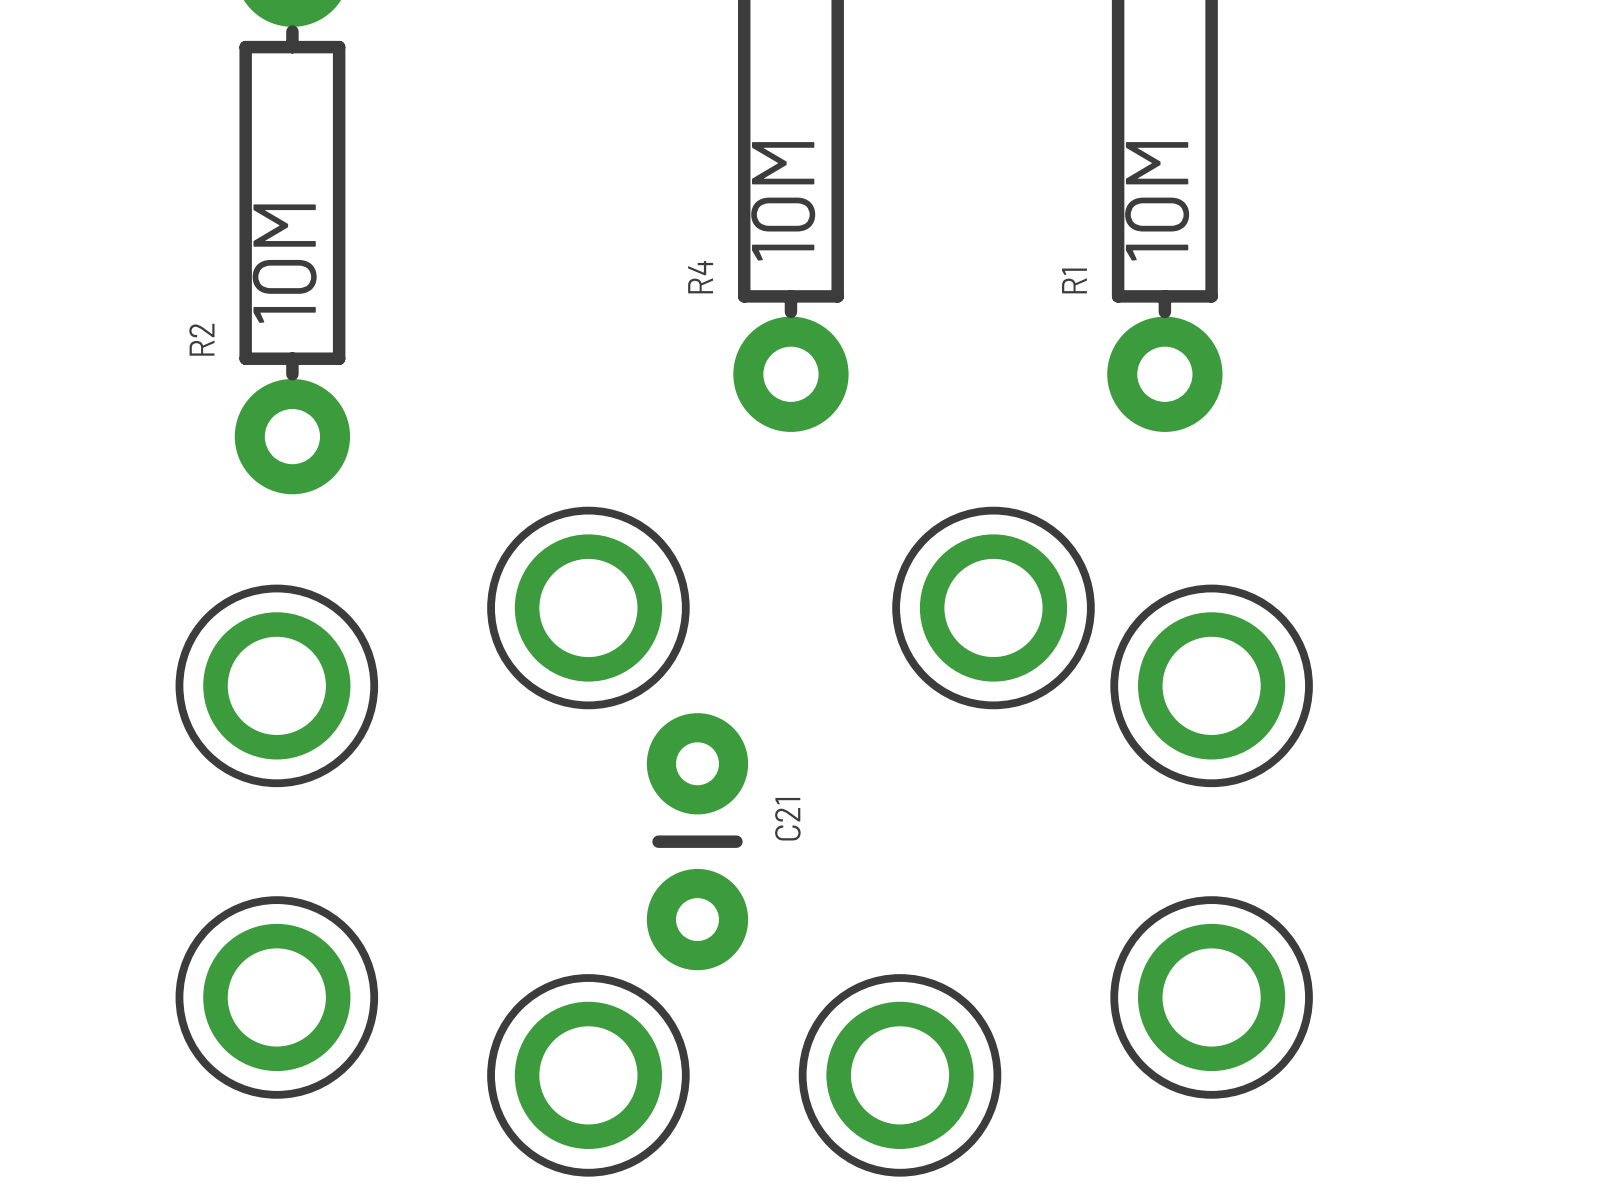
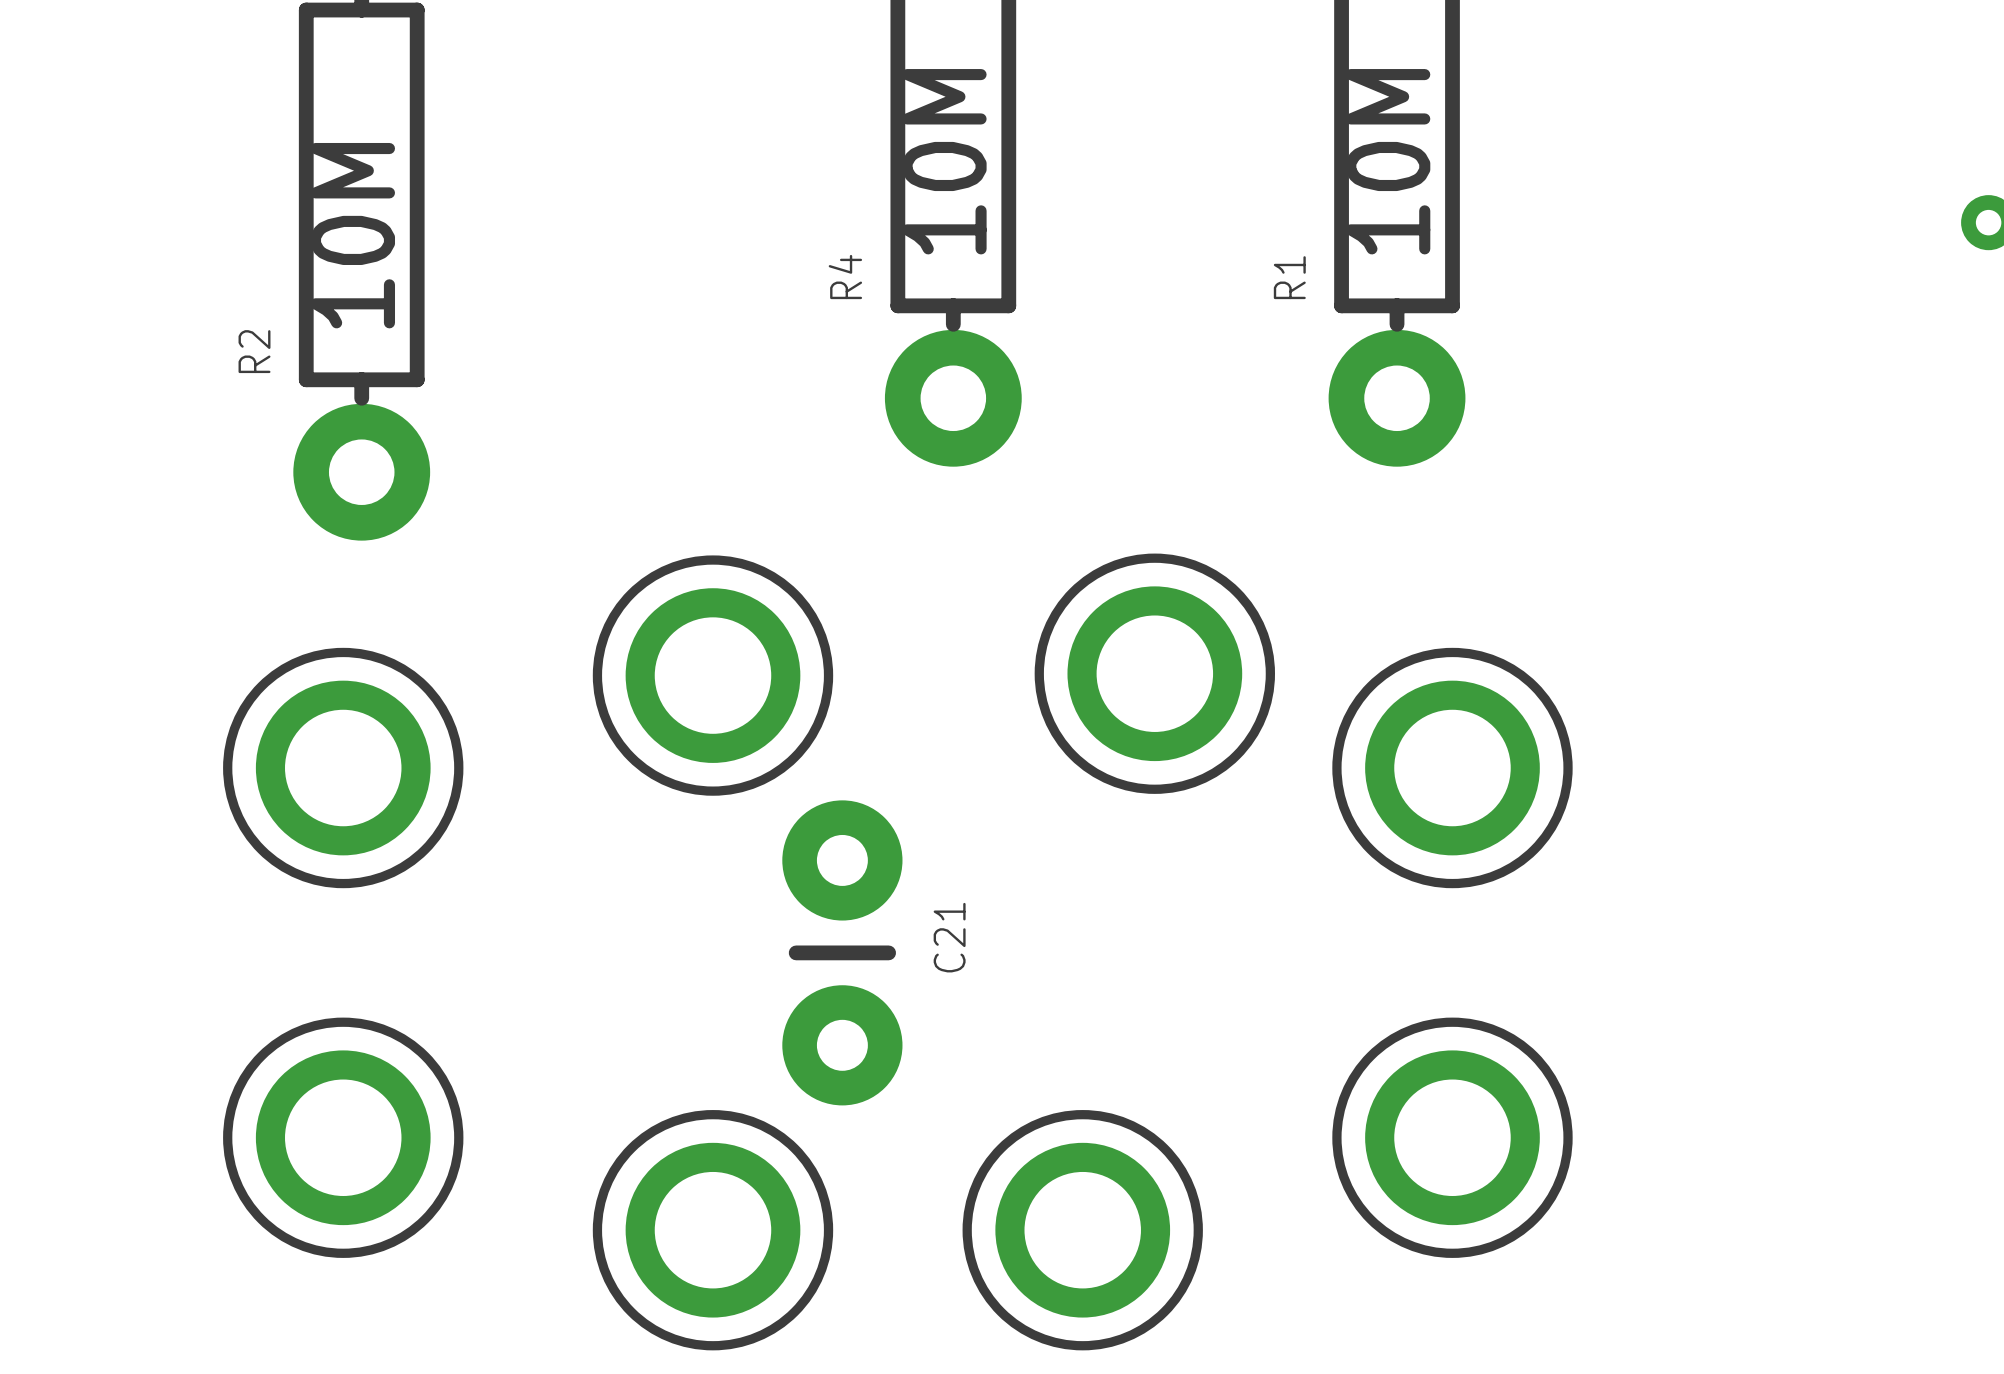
part position: (993, 607) -> (1154, 673)

